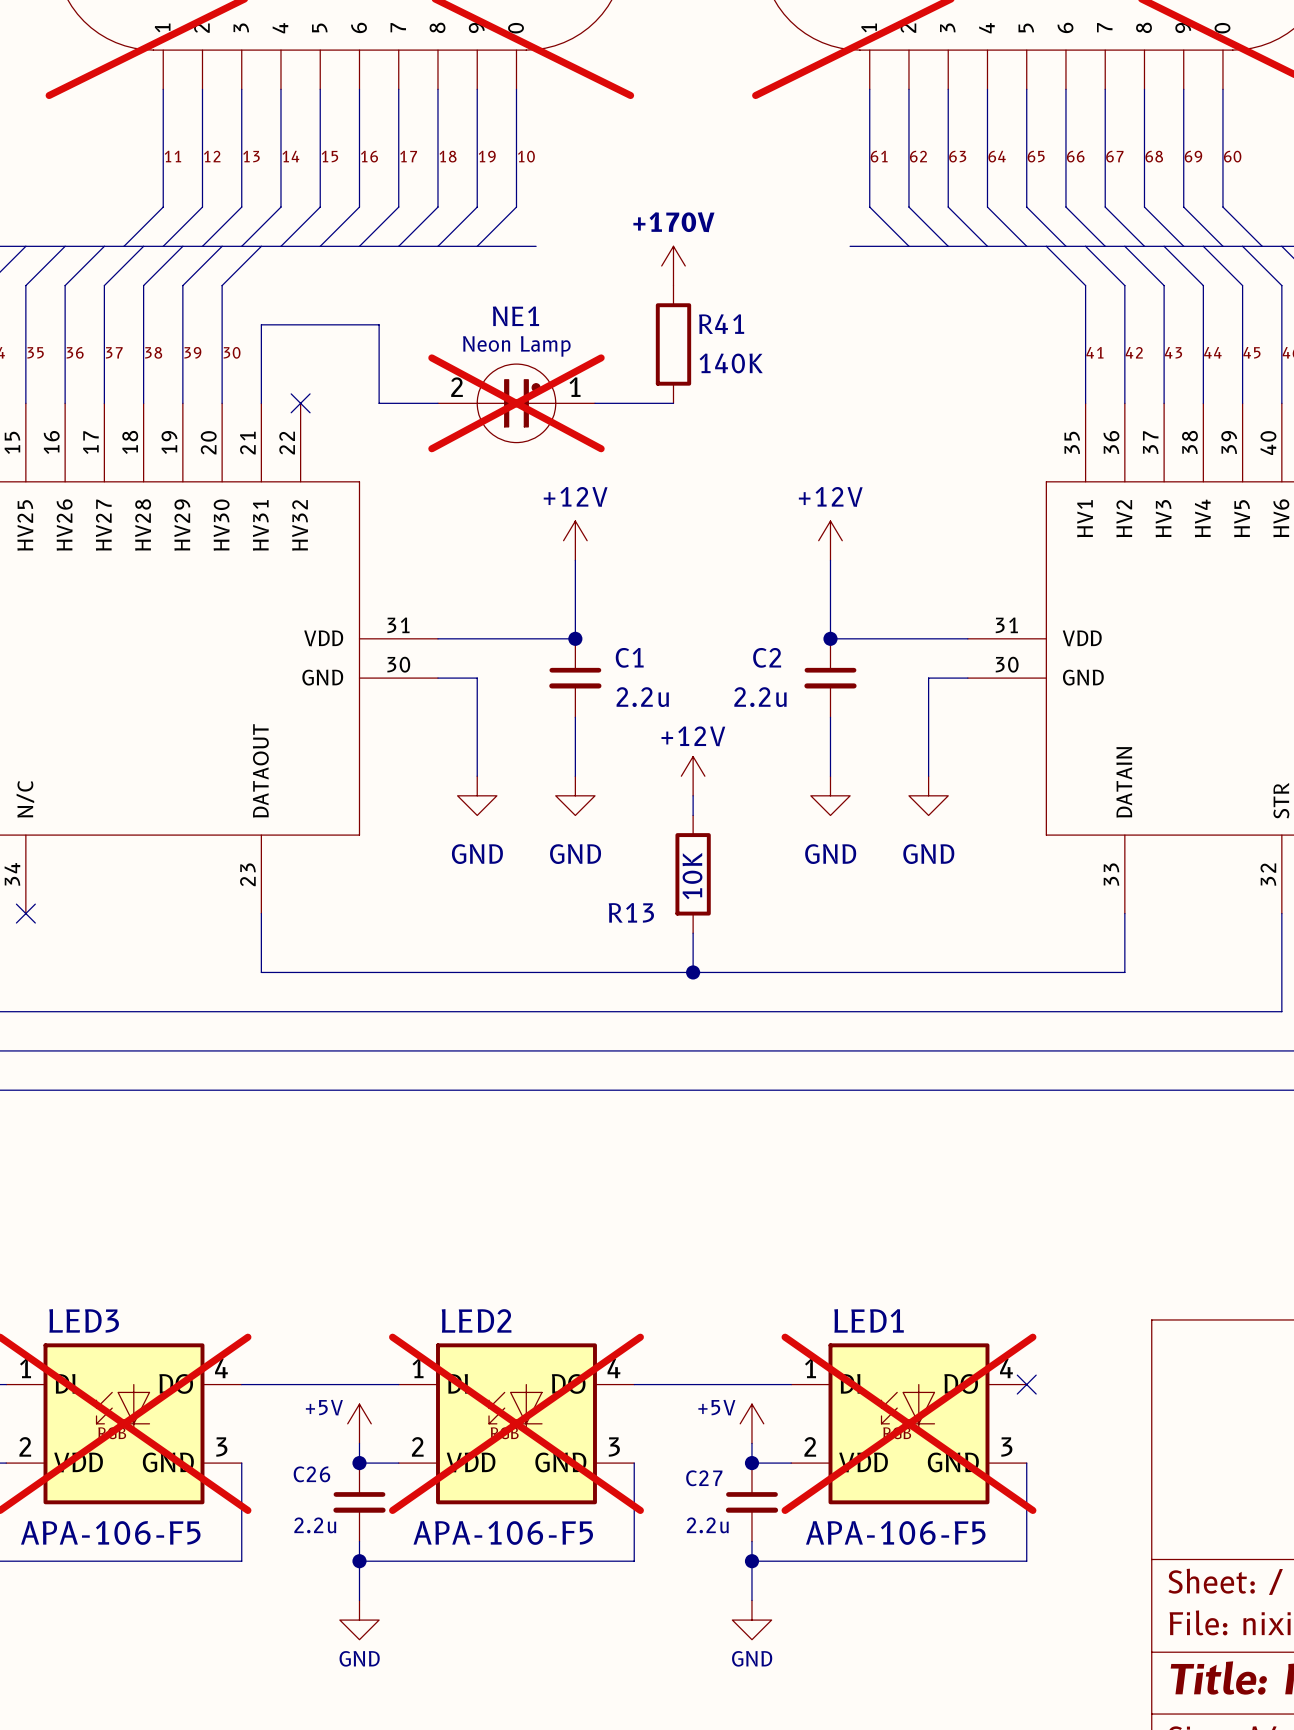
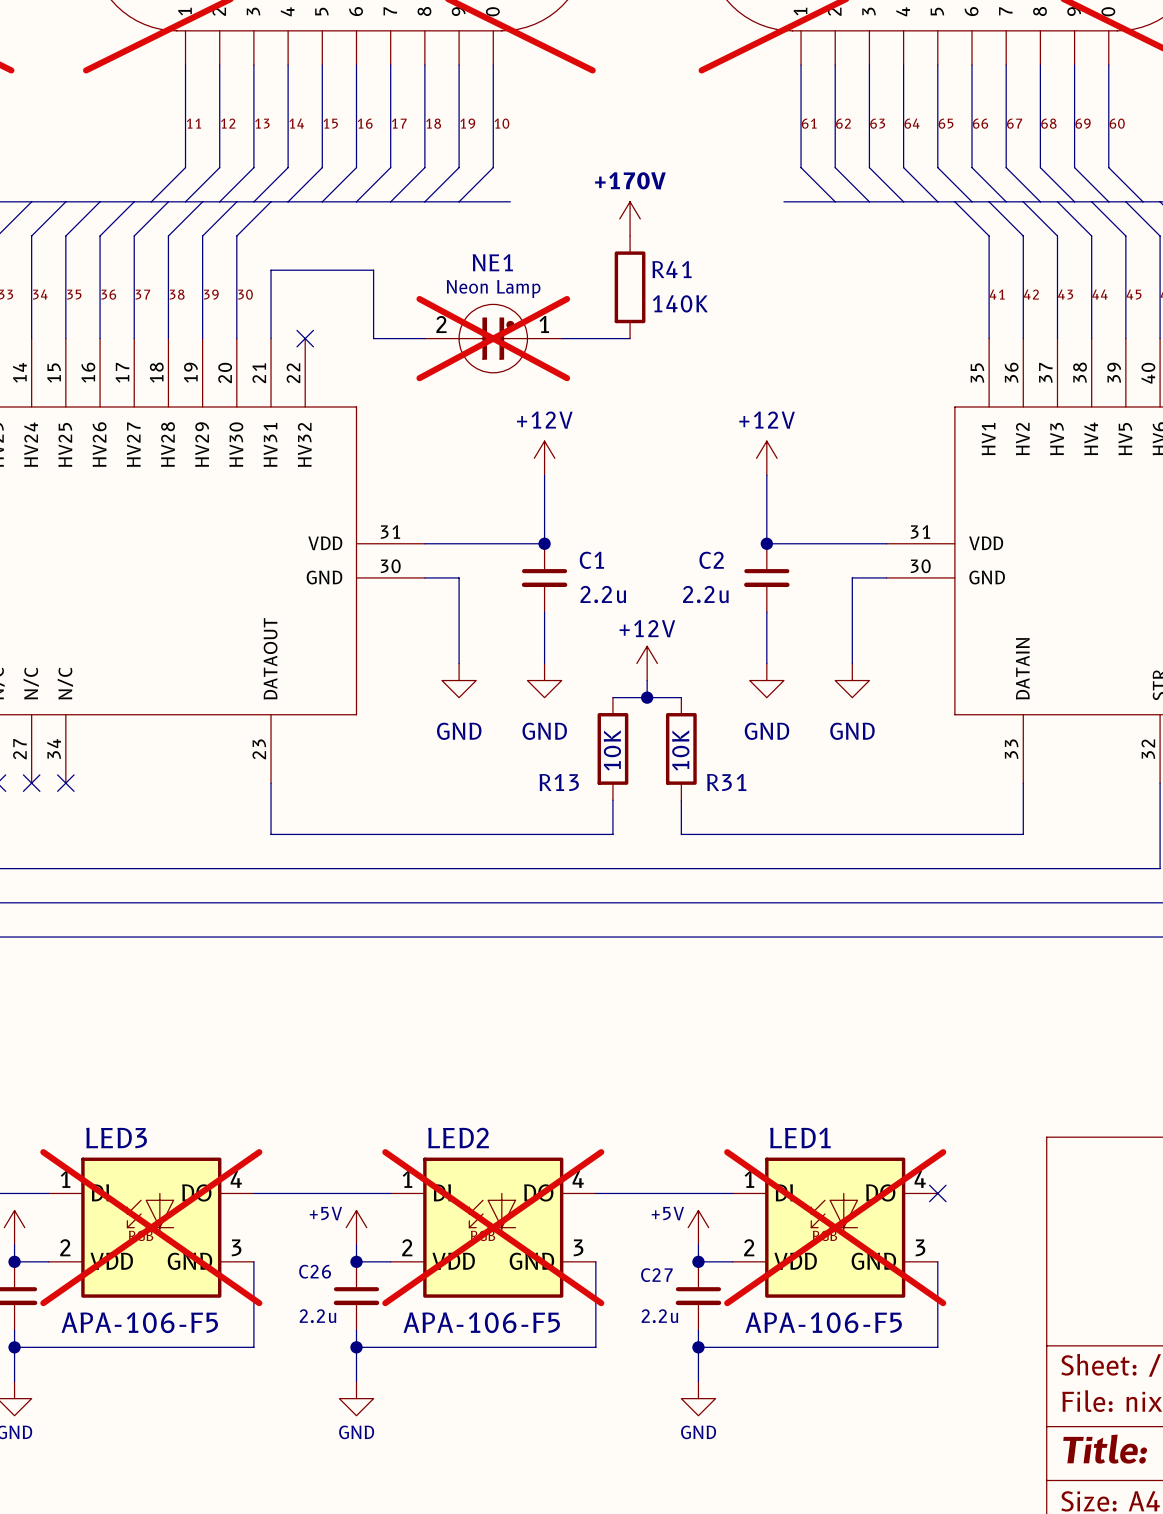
wire: none -> (612, 697) (681, 697)
junction: none -> (647, 697)
R13 position: (693, 874) -> (612, 748)
R31: none -> 10K (681, 748)
wire: (693, 933) (693, 972) -> (681, 800) (681, 834)
wire: (653, 972) (732, 972) -> (612, 834) (612, 800)
junction: (693, 972) -> none

